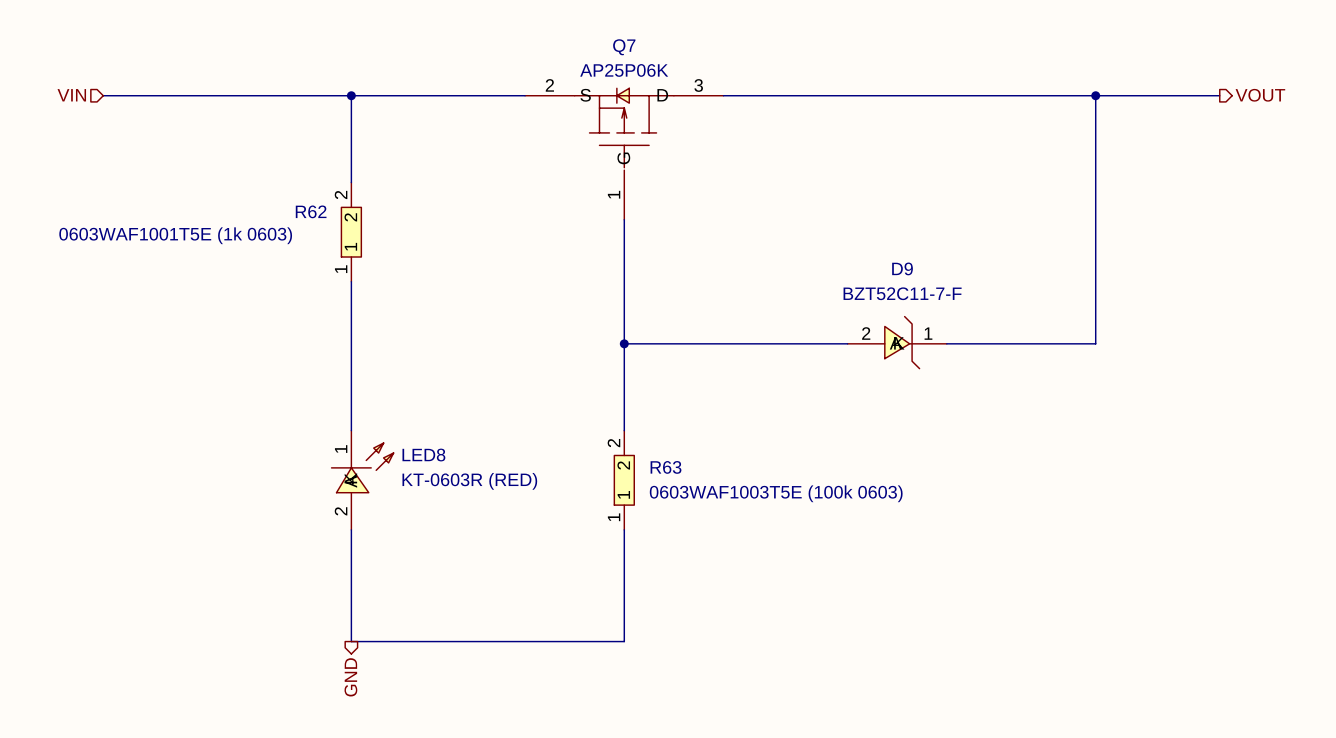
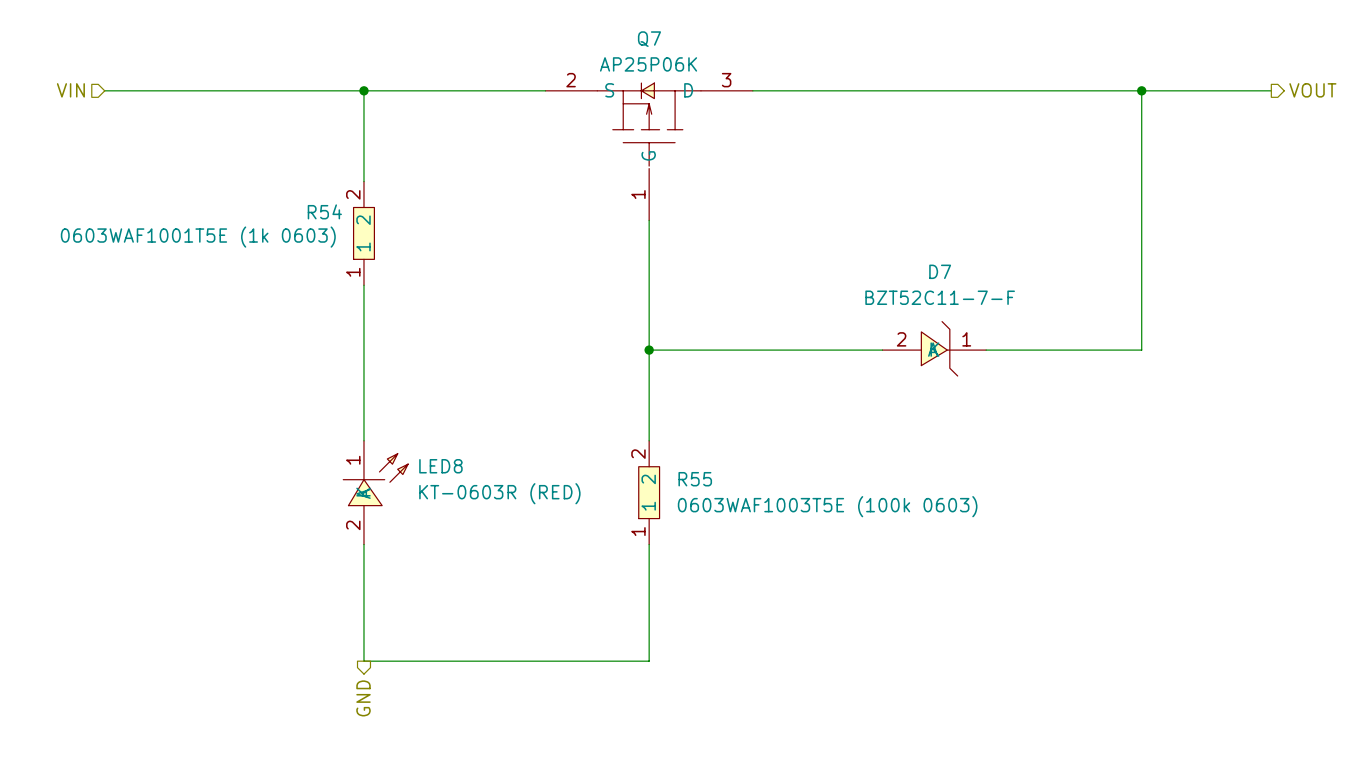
R62 name: R62 (311, 211) -> R54 (324, 211)
D9 name: D9 (902, 268) -> D7 (940, 271)
R63 name: R63 (665, 467) -> R55 (695, 479)

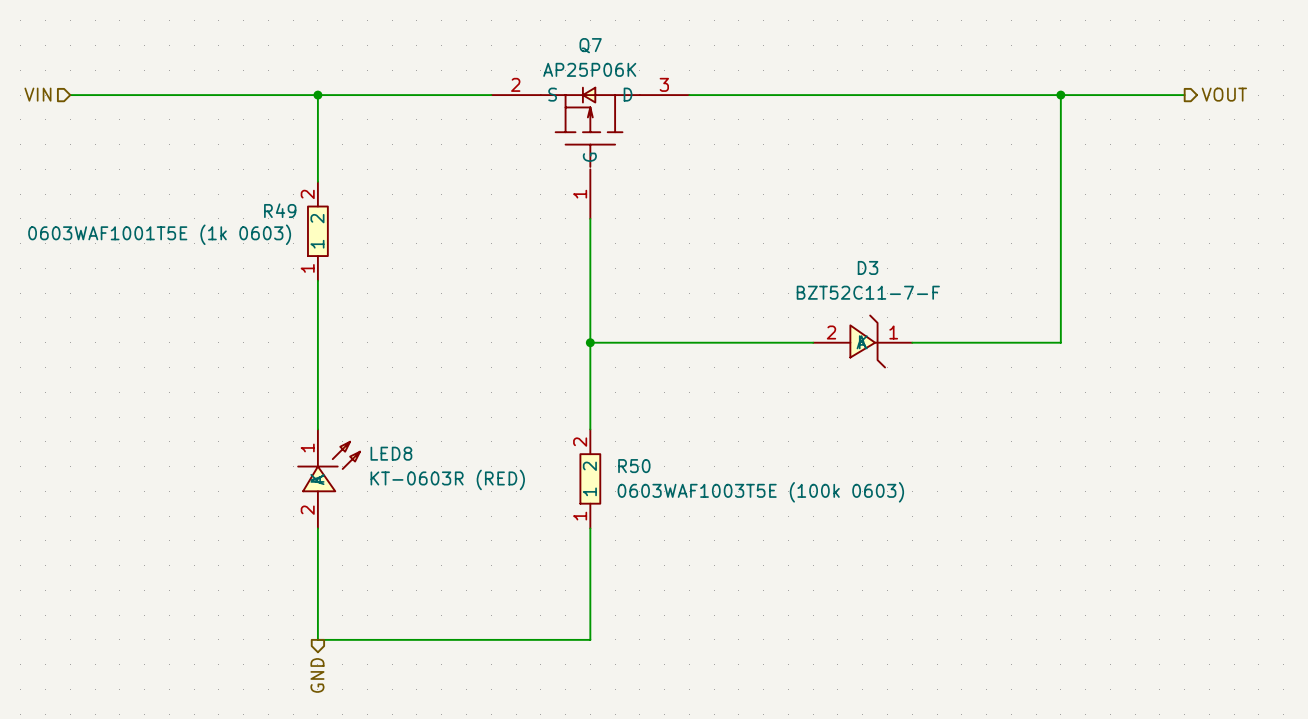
R54 name: R54 (324, 211) -> R49 (280, 210)
D7 name: D7 (940, 271) -> D3 (868, 267)
R55 name: R55 (695, 479) -> R50 (634, 466)

